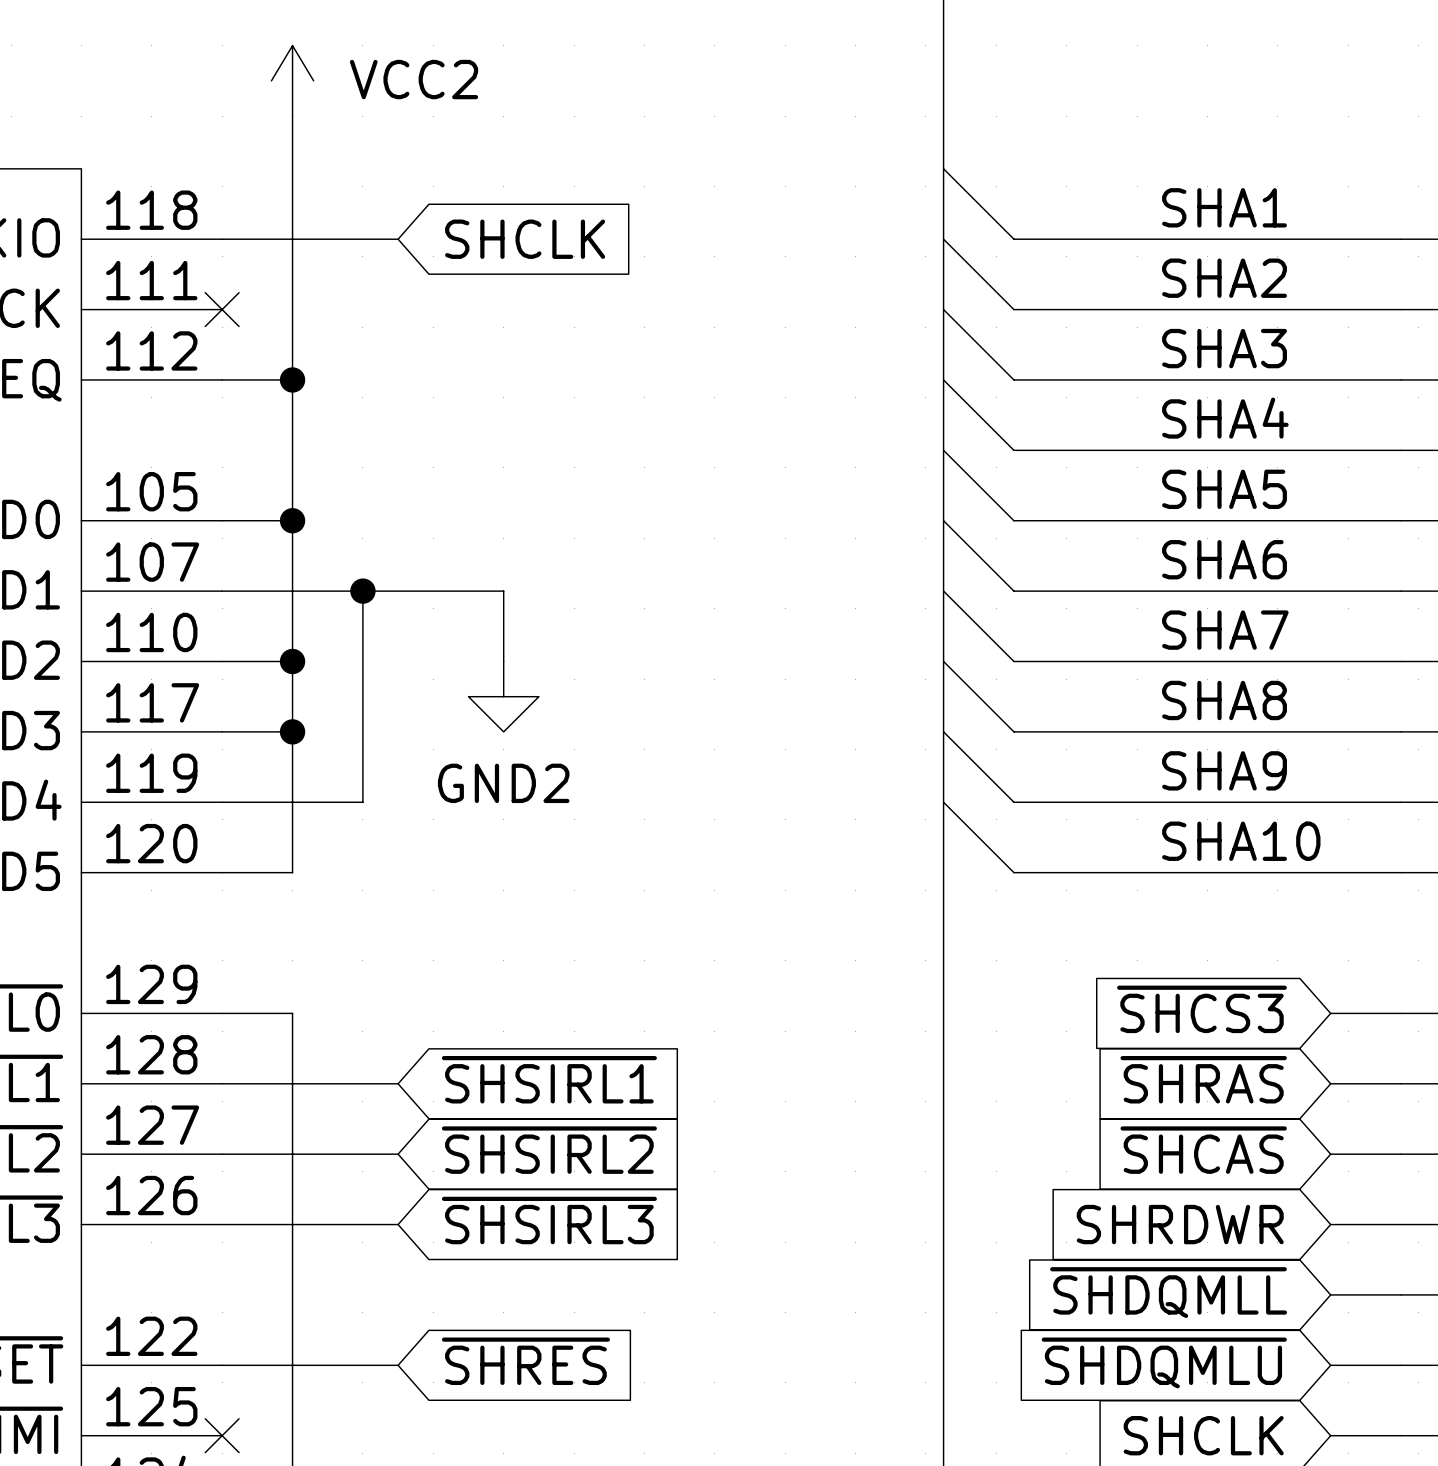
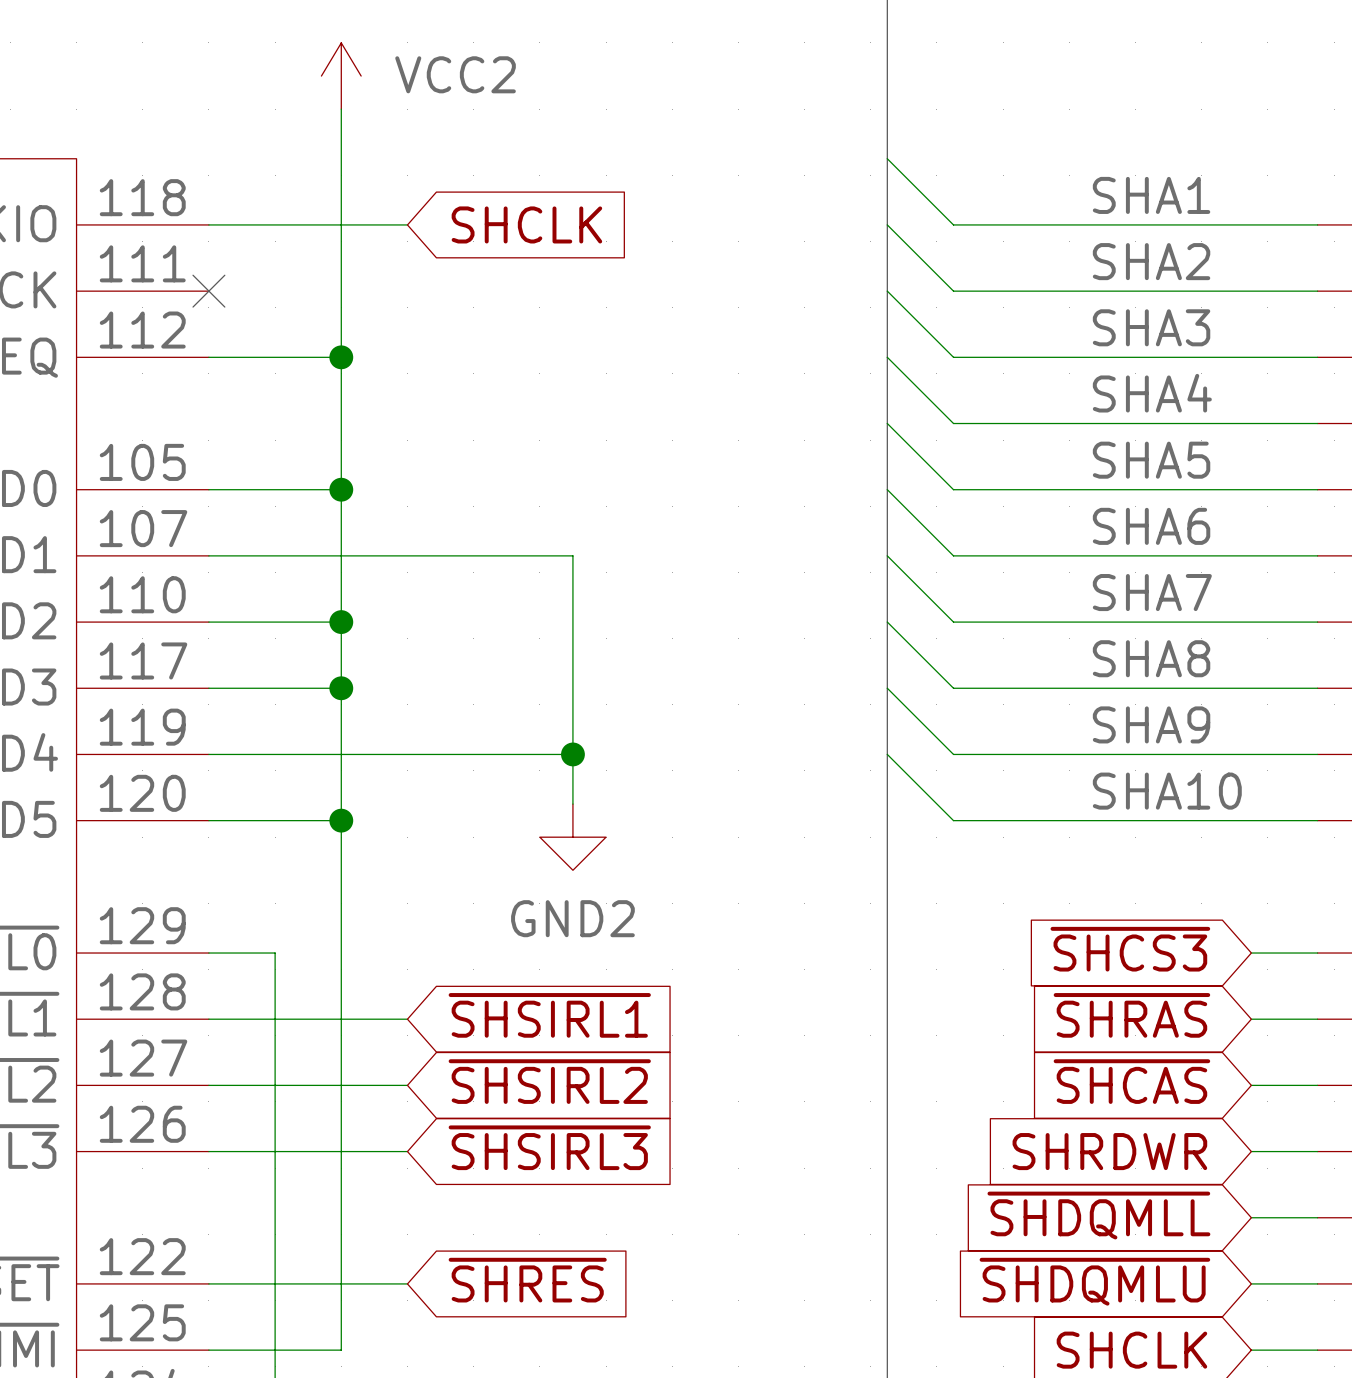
power symbol position: VCC2 (292, 80) -> VCC2 (341, 76)
wire: (292, 116) (292, 872) -> (341, 820) (275, 820)
wire: none -> (341, 109) (341, 555)
wire: none -> (374, 224) (407, 224)
global label position: SHCLK (525, 239) -> SHCLK (526, 224)
wire: none -> (275, 357) (341, 357)
junction position: (292, 379) -> (341, 357)
wire: none -> (275, 489) (341, 489)
junction: (292, 520) -> none
junction: none -> (341, 489)
junction: (362, 591) -> none
wire: (503, 591) (503, 661) -> (473, 555) (572, 555) (572, 804)
wire: none -> (275, 622) (341, 622)
junction: (292, 661) -> none
junction: none -> (341, 622)
power symbol position: GND2 (503, 696) -> GND2 (572, 837)
wire: none -> (275, 688) (341, 688)
junction: (292, 731) -> none
junction: none -> (341, 688)
wire: none -> (572, 754) (341, 754) (341, 1350) (208, 1350)
junction: none -> (572, 754)
junction: none -> (341, 820)
global label position: ~{SHSIRL1} (549, 1079) -> ~{SHSIRL1} (549, 1015)
wire: none -> (374, 1019) (407, 1019)
global label position: ~{SHSIRL2} (549, 1150) -> ~{SHSIRL2} (549, 1081)
wire: none -> (374, 1085) (407, 1085)
global label position: ~{SHSIRL3} (549, 1220) -> ~{SHSIRL3} (549, 1147)
wire: none -> (374, 1151) (407, 1151)
global label position: ~{SHRES} (525, 1361) -> ~{SHRES} (527, 1280)
wire: none -> (374, 1283) (407, 1283)
no-connect mark: (222, 1435) -> none

